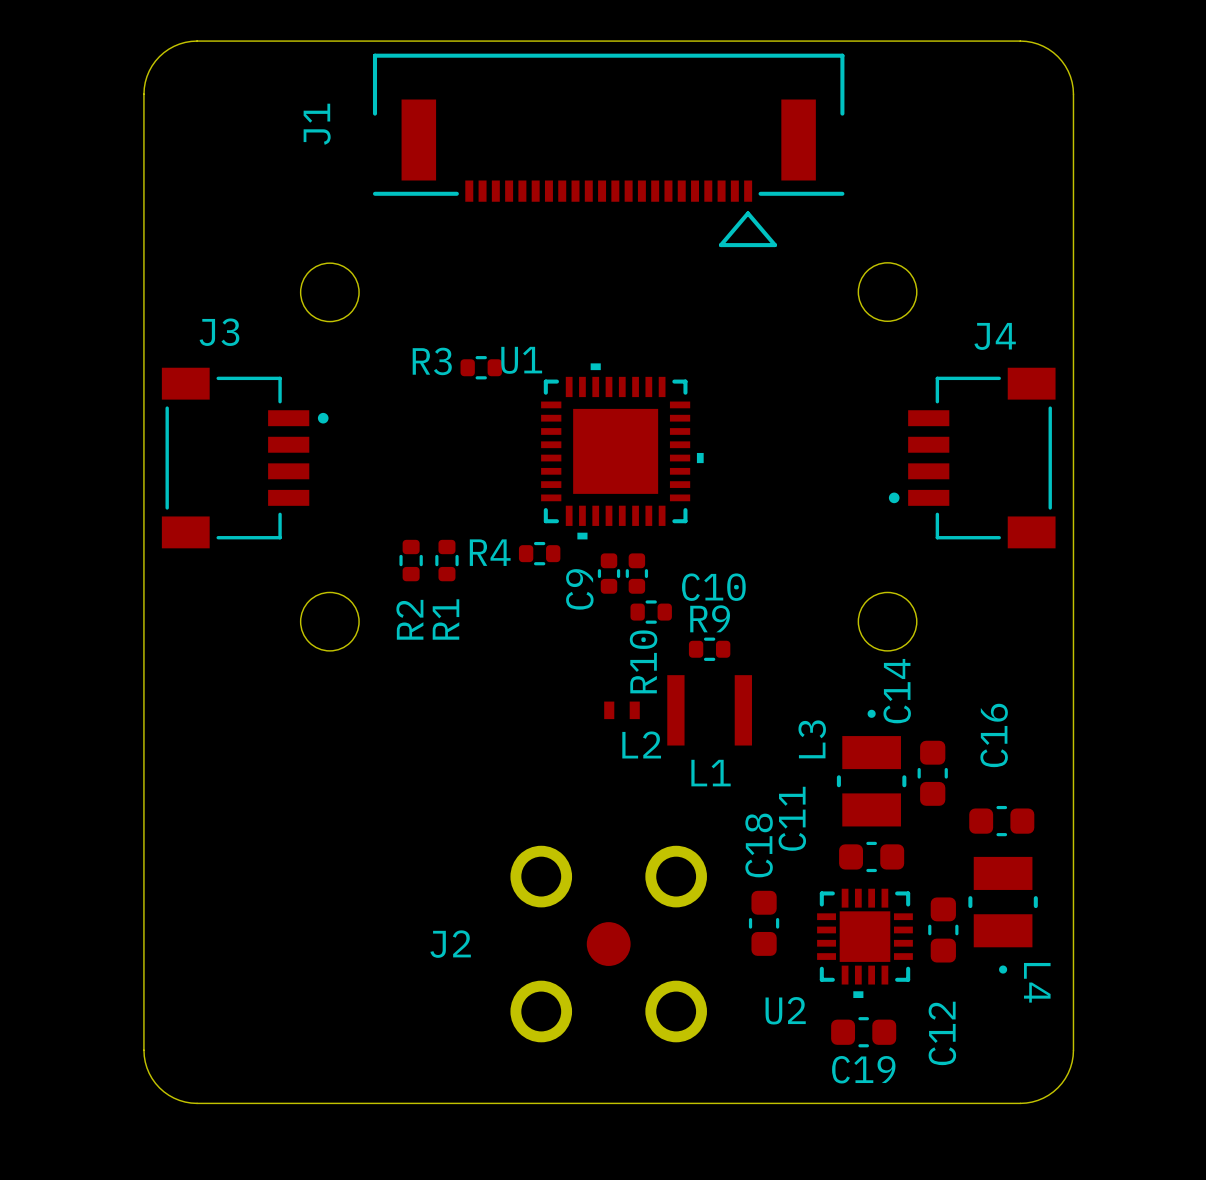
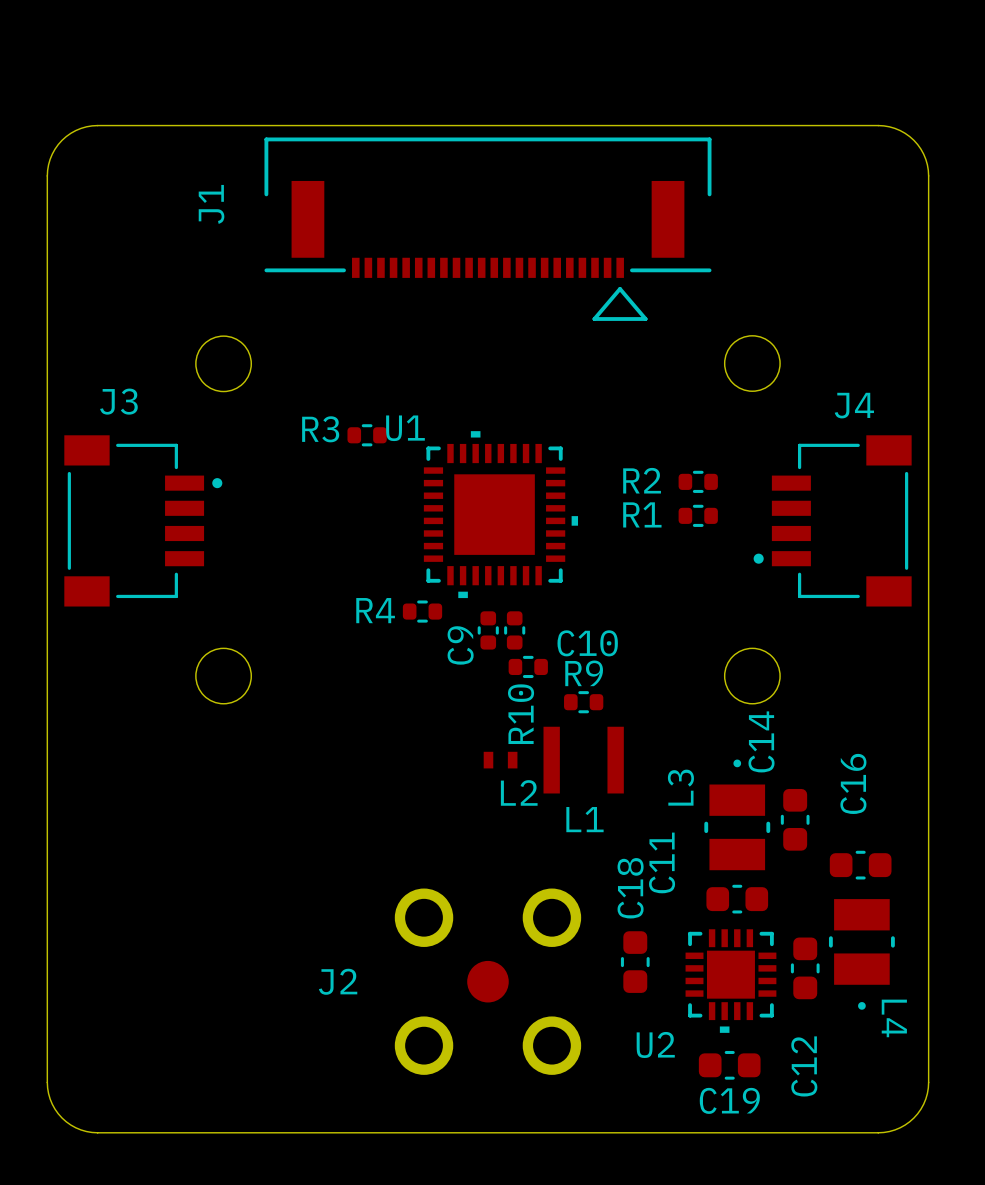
R2 rotation: 0° (411, 560) -> 90° clockwise (698, 481)
R2 position: (411, 560) -> (698, 481)
R1 rotation: 0° (446, 560) -> 90° clockwise (698, 515)
R1 position: (446, 560) -> (698, 515)

